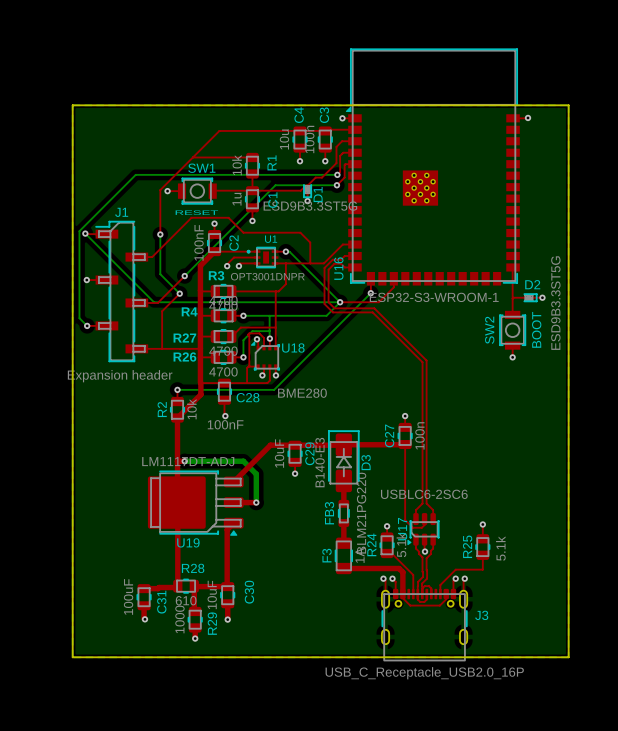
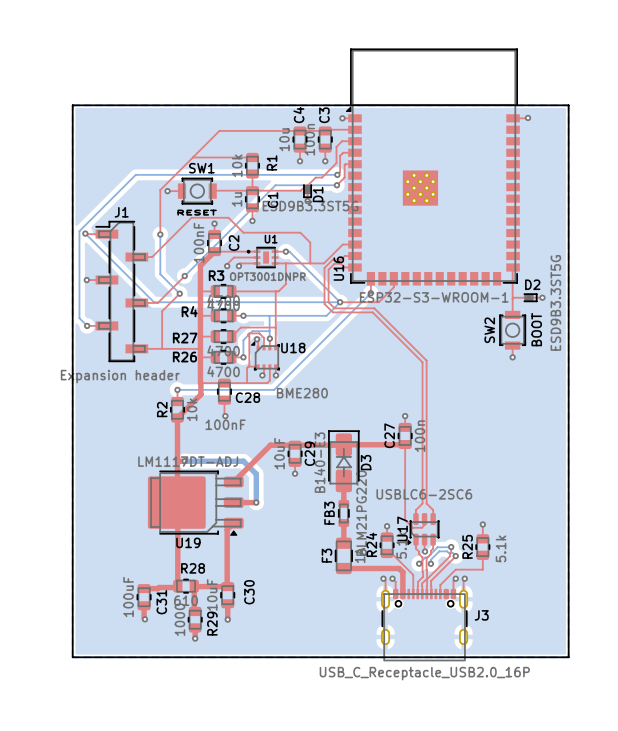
bottom track: none -> (451, 547) (437, 547) (419, 563)
via: none -> (451, 547)
bottom track: none -> (455, 556) (447, 551) (439, 551) (430, 559) (430, 563)
via: none -> (455, 556)
via: none -> (419, 563)
via: none -> (430, 563)
top track: (422, 588) (424, 586) (431, 588) -> (455, 556) (431, 580) (431, 588)
top track: (402, 594) (402, 598) (410, 605) (439, 605) (446, 599) (446, 594) -> none
top track: (417, 594) (417, 599) (420, 601) (426, 599) (426, 594) -> (451, 547) (449, 556) (427, 579) (426, 594)

